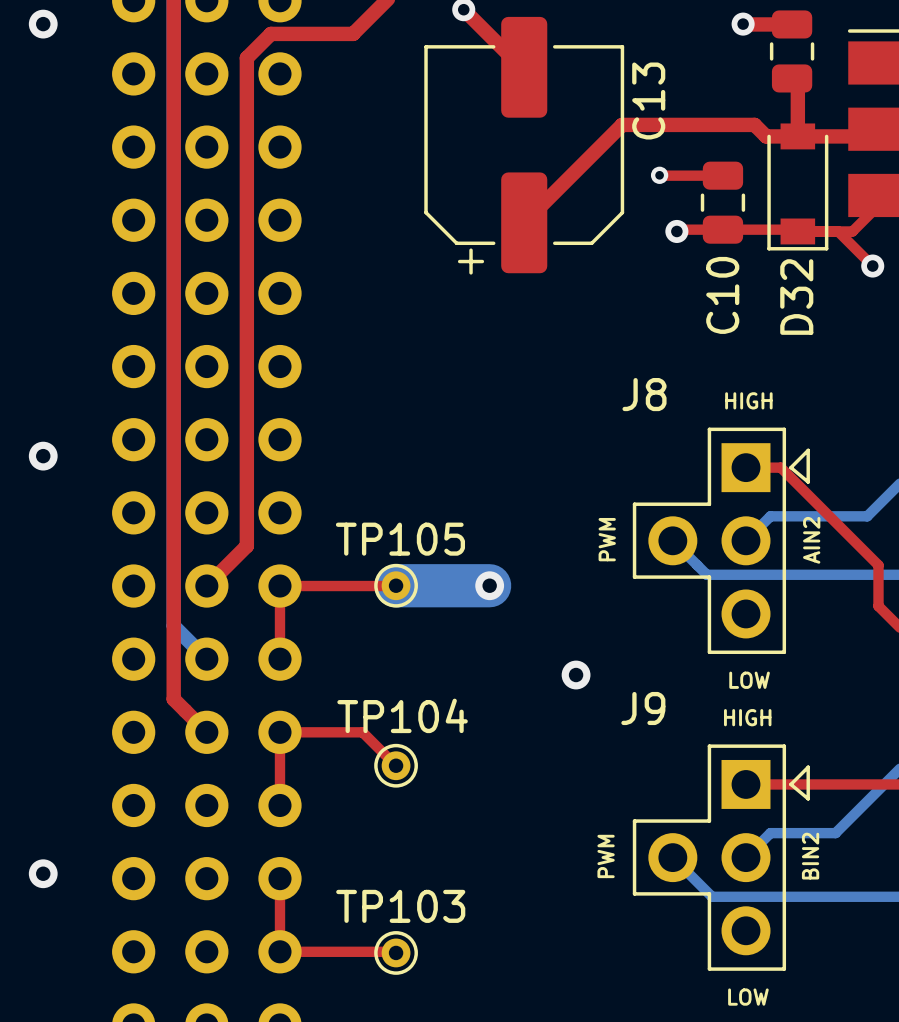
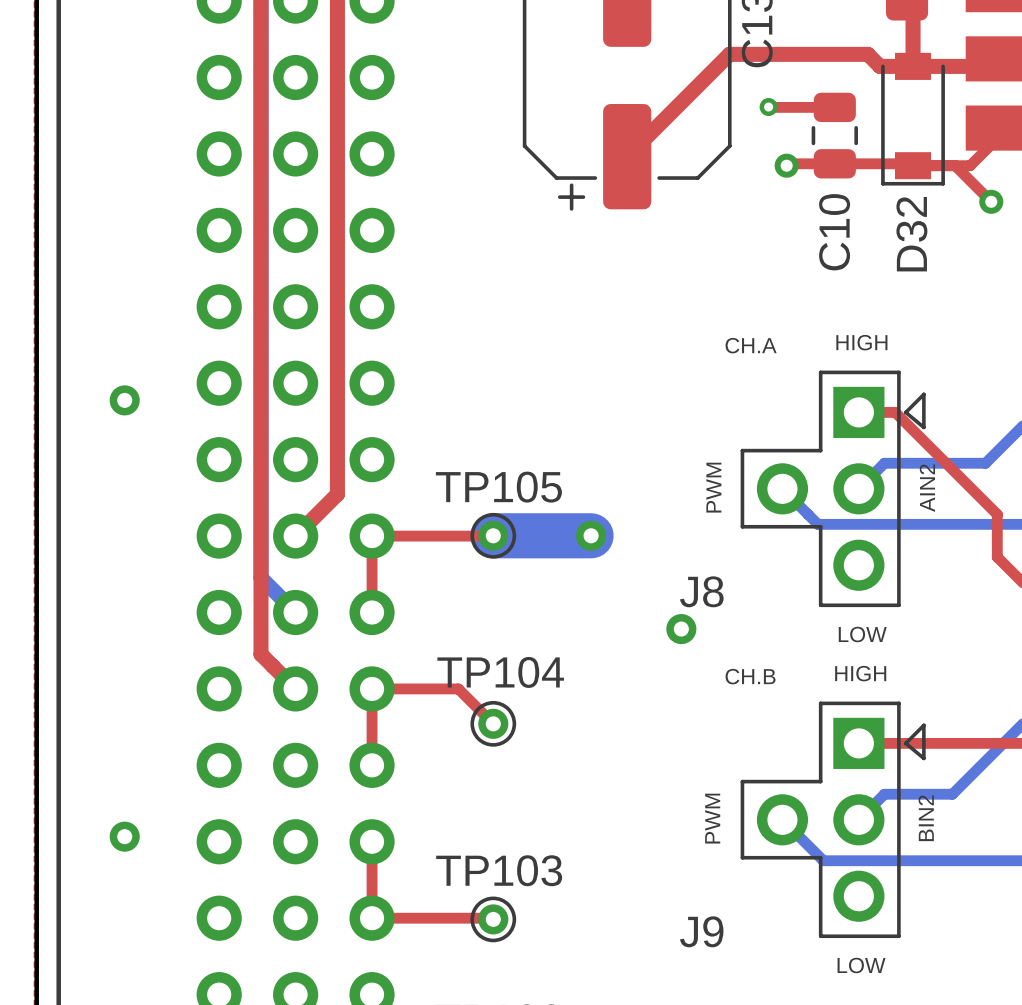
J8 name position: J8 (644, 394) -> J8 (701, 591)
text: none -> CH.A (751, 345)
J9 name position: J9 (643, 708) -> J9 (701, 931)
text: none -> CH.B (750, 676)

